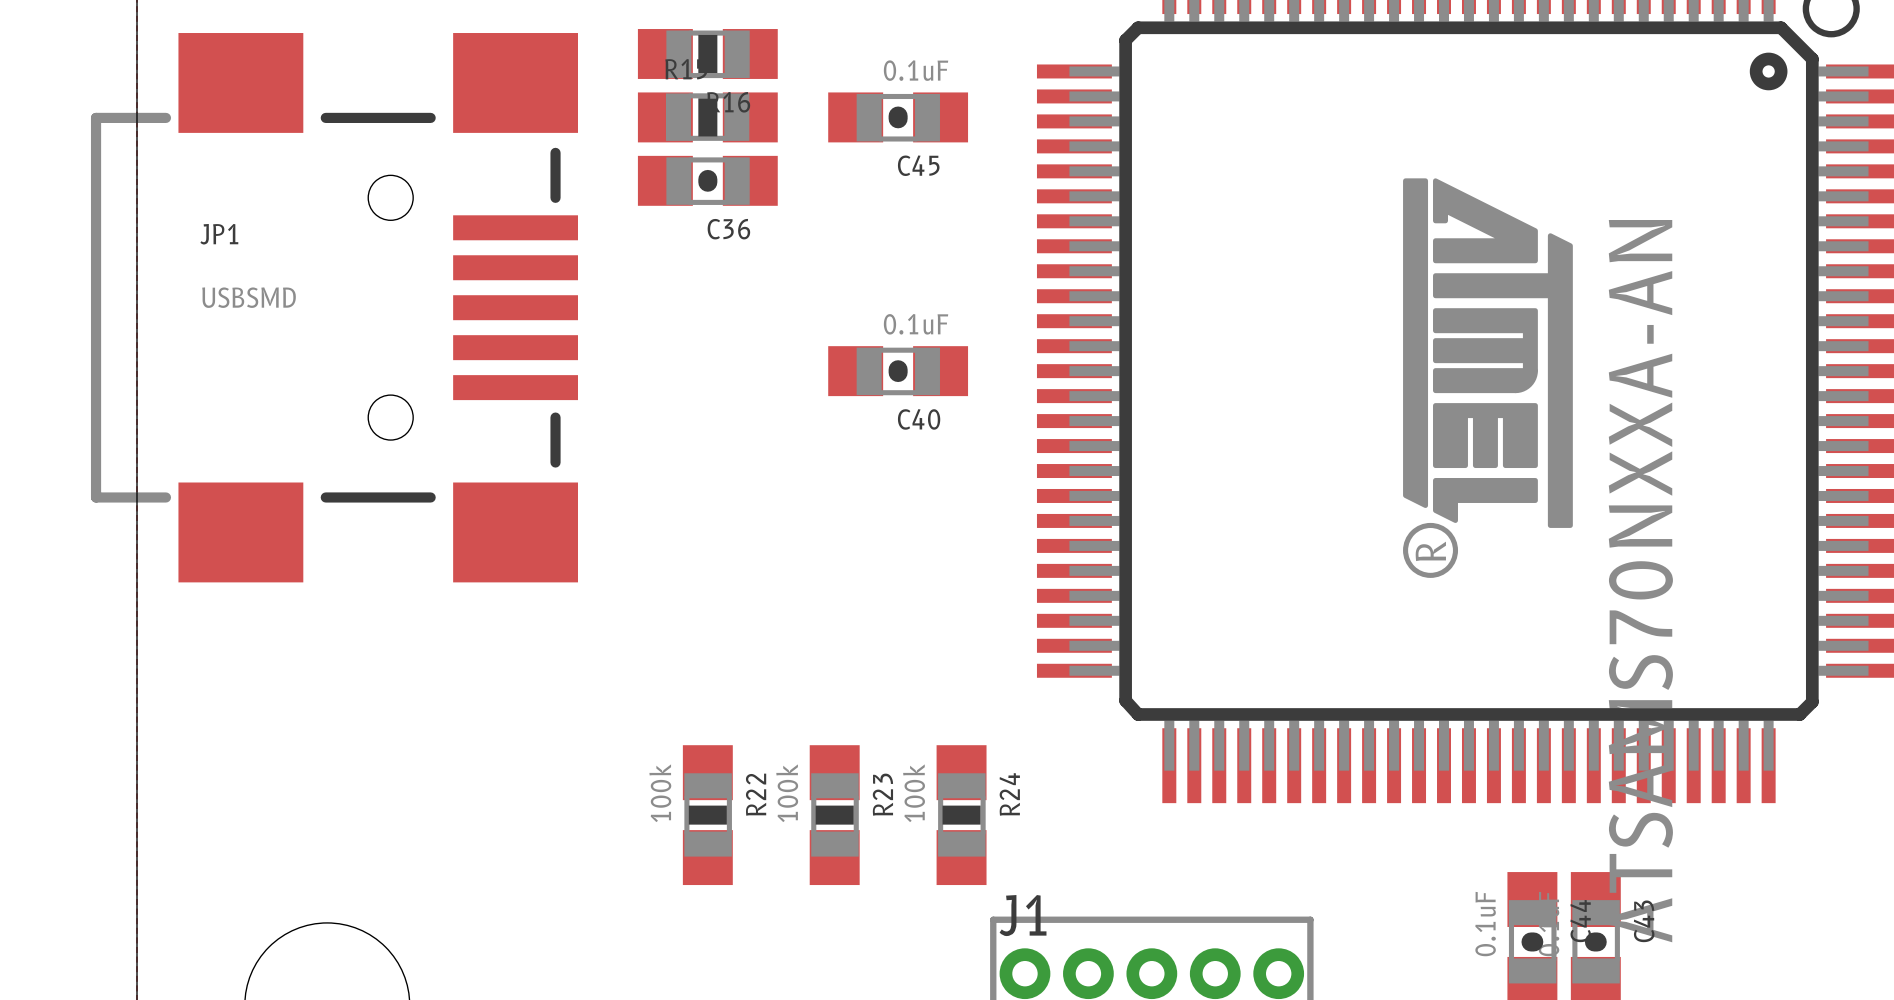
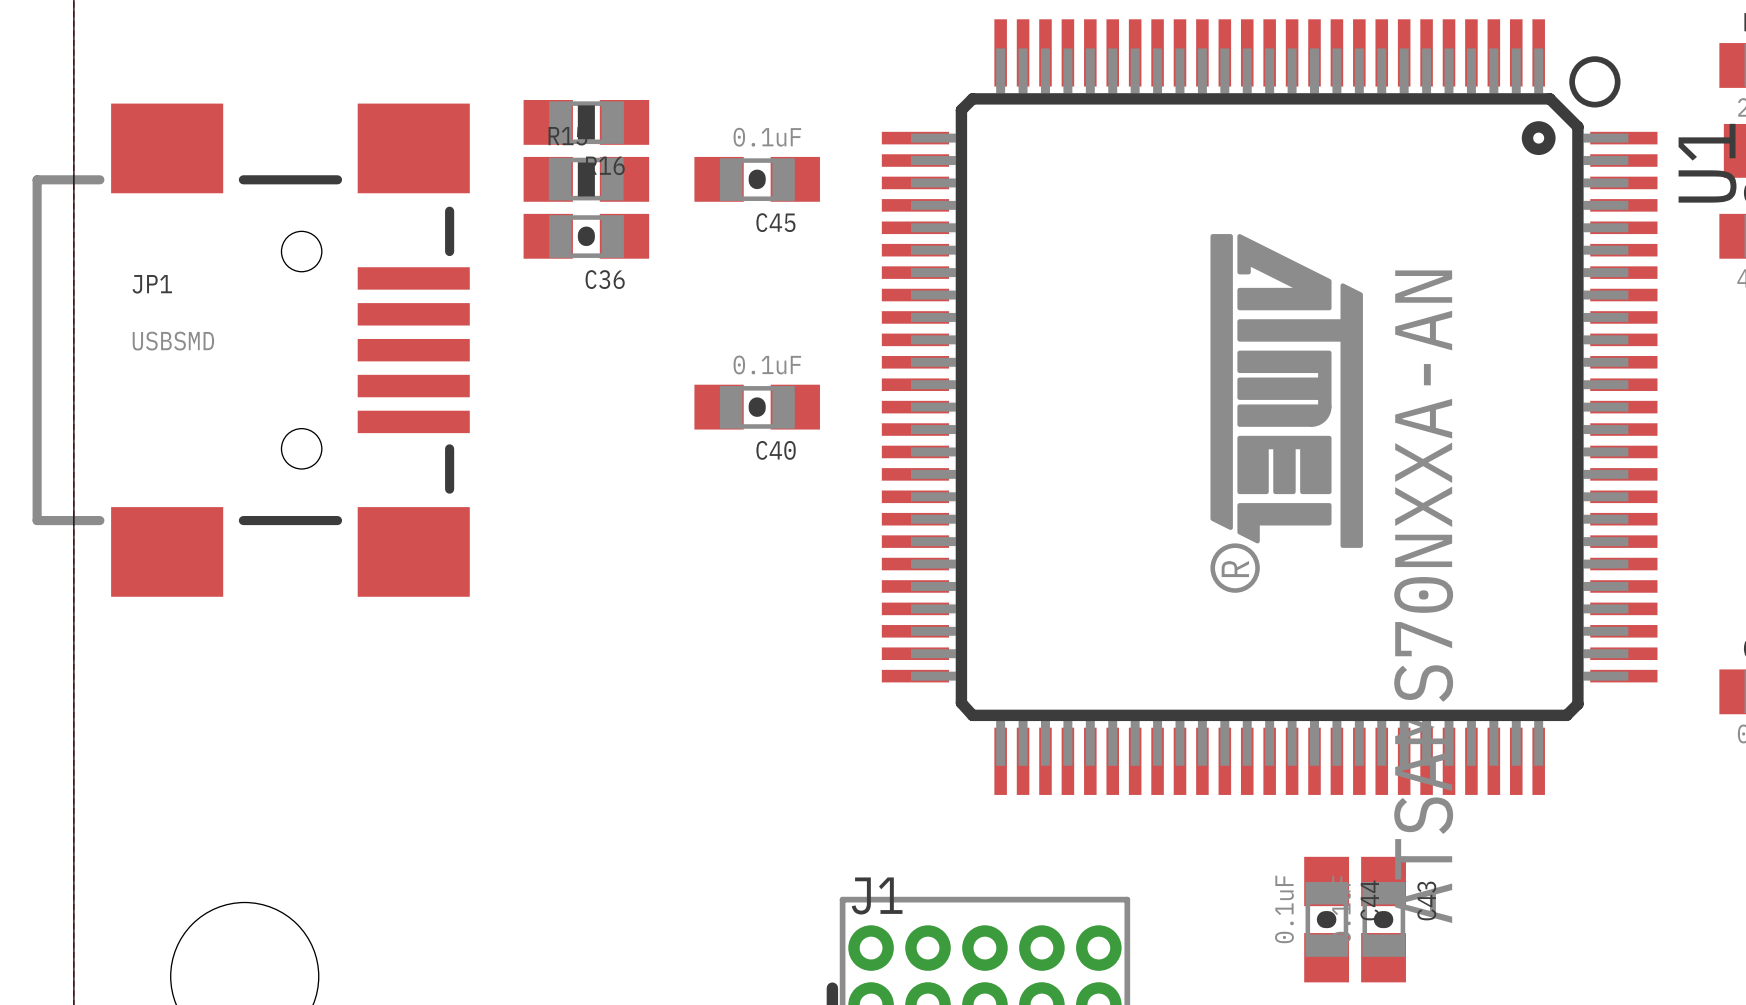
R22: 100k (707, 815) -> none
R23: 100k (834, 815) -> none
R24: 100k (961, 815) -> none

